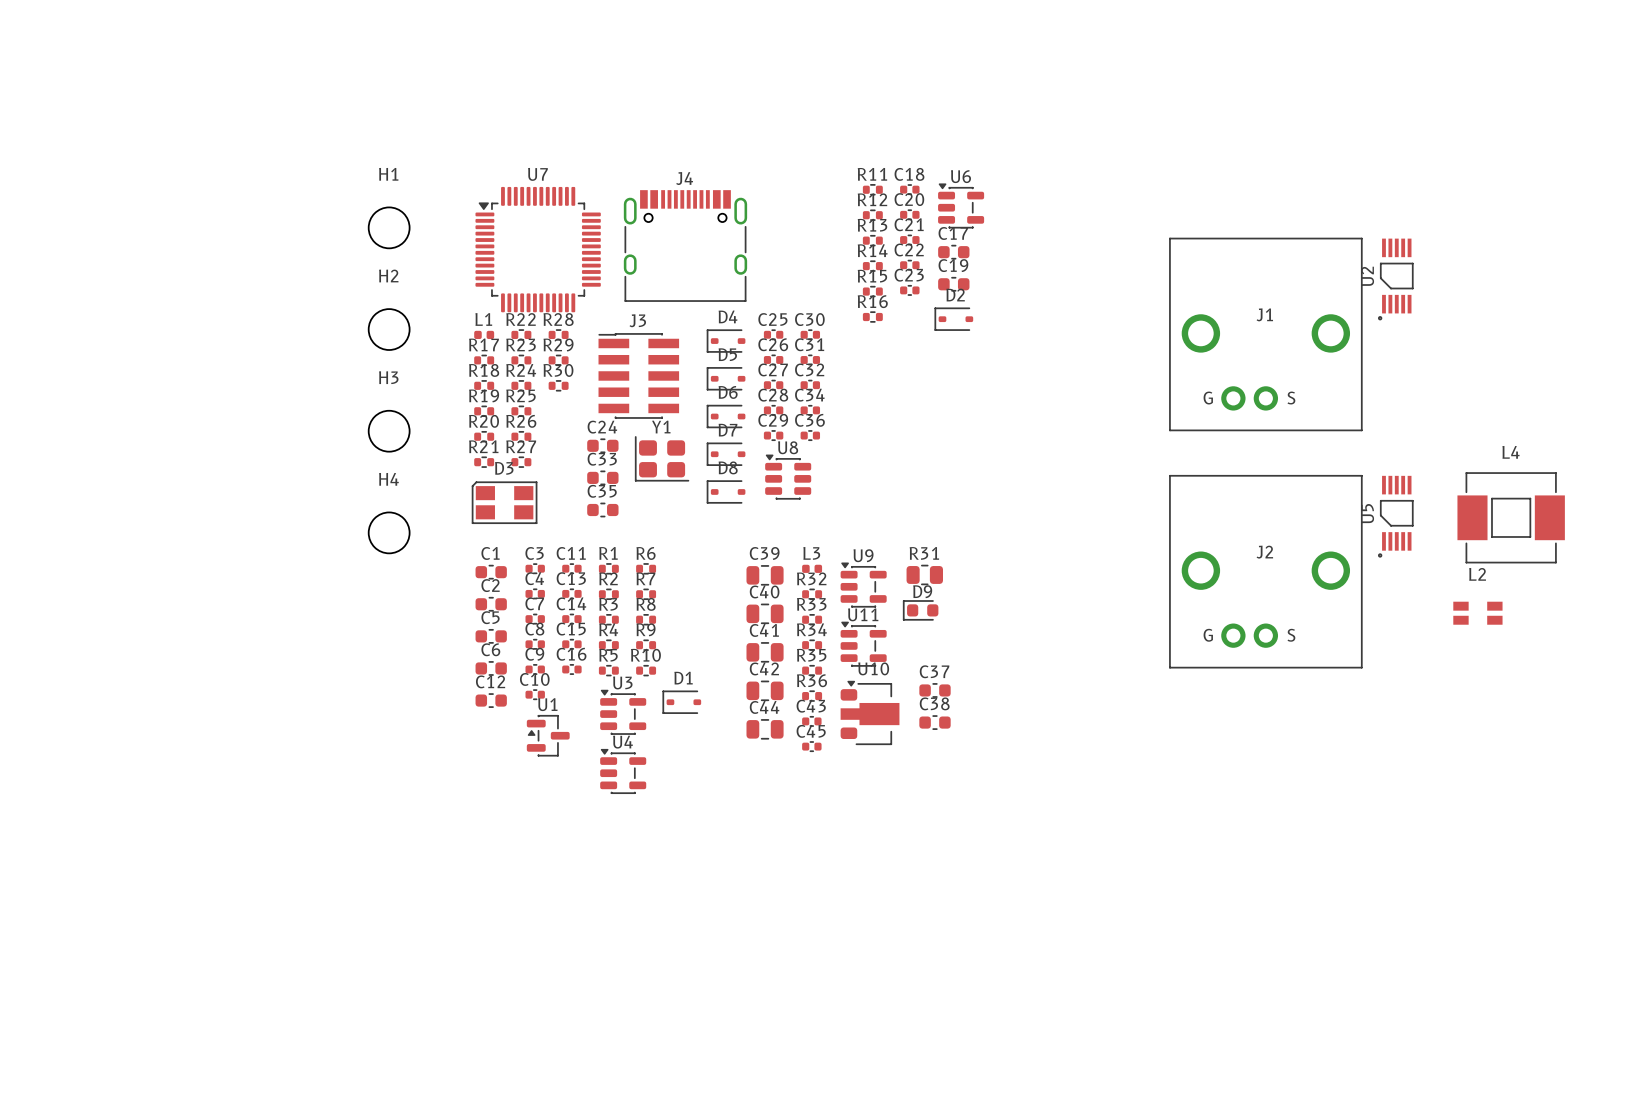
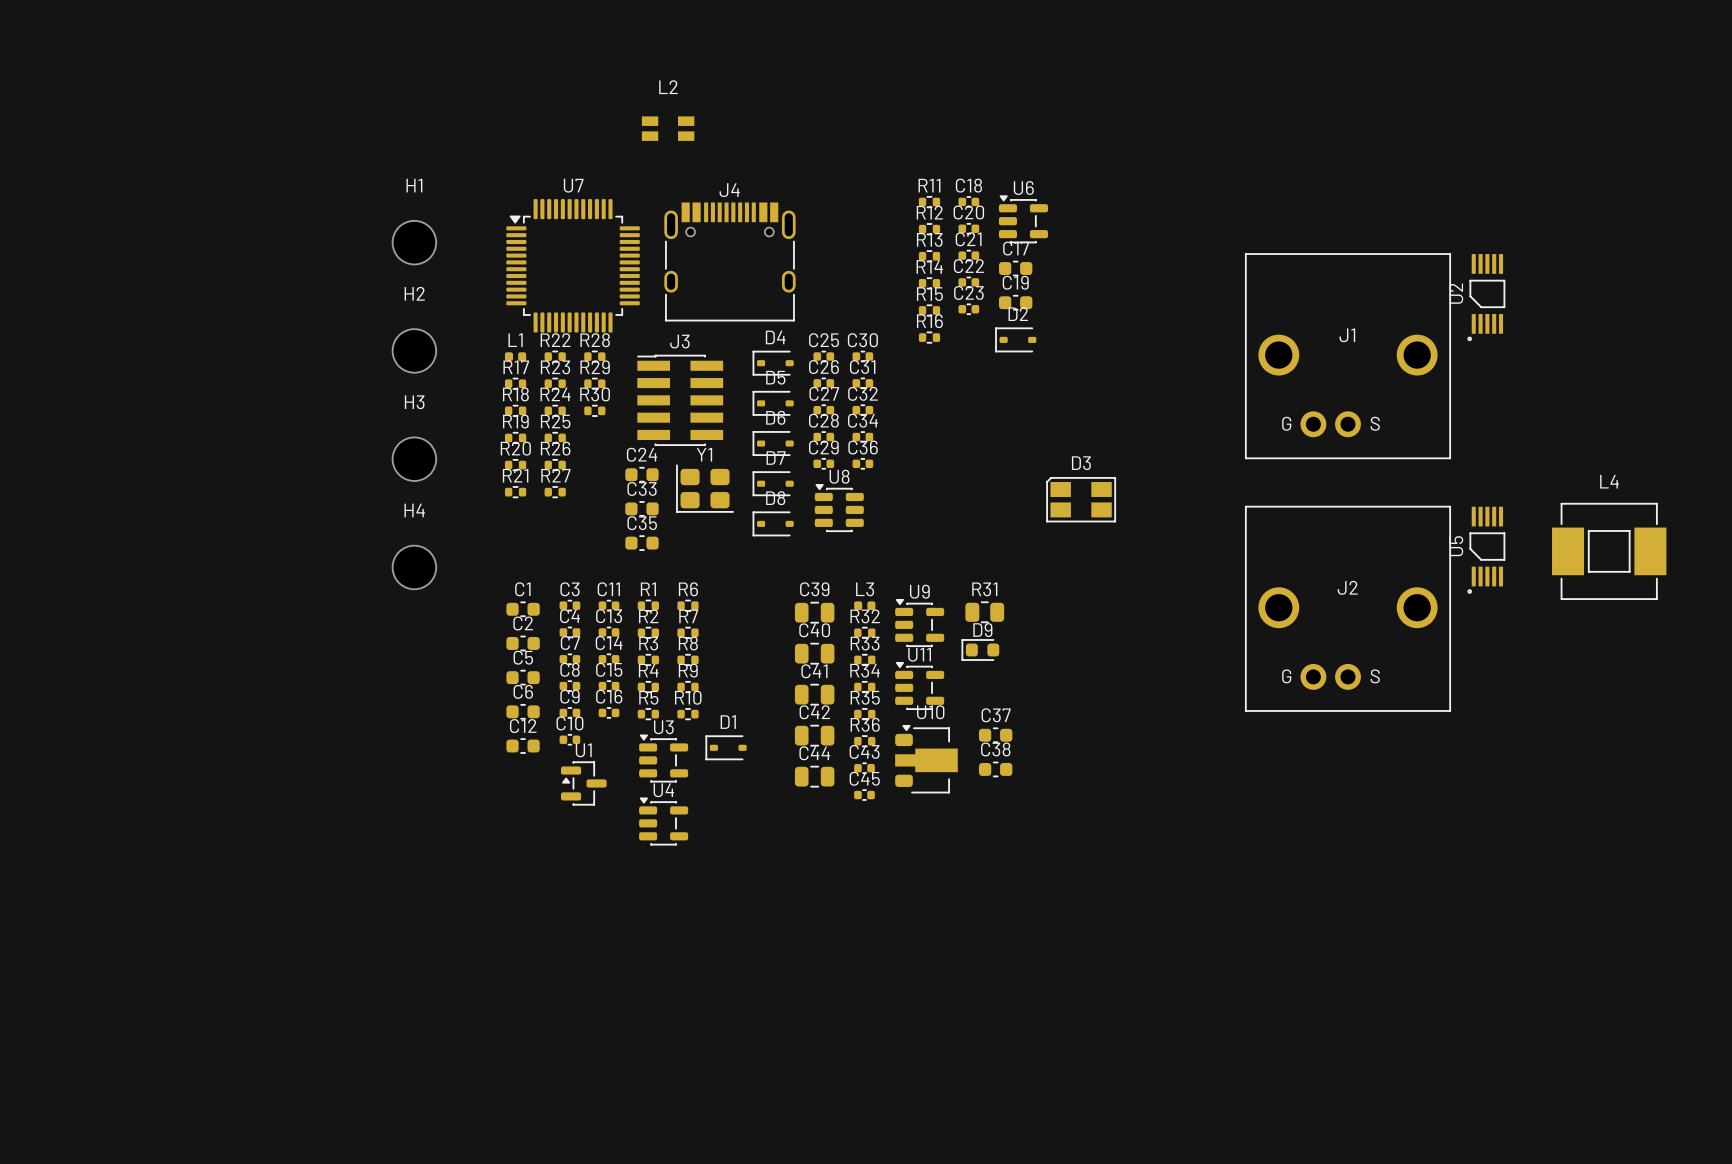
D3 position: (504, 502) -> (1081, 499)
L2 position: (1477, 613) -> (668, 128)

